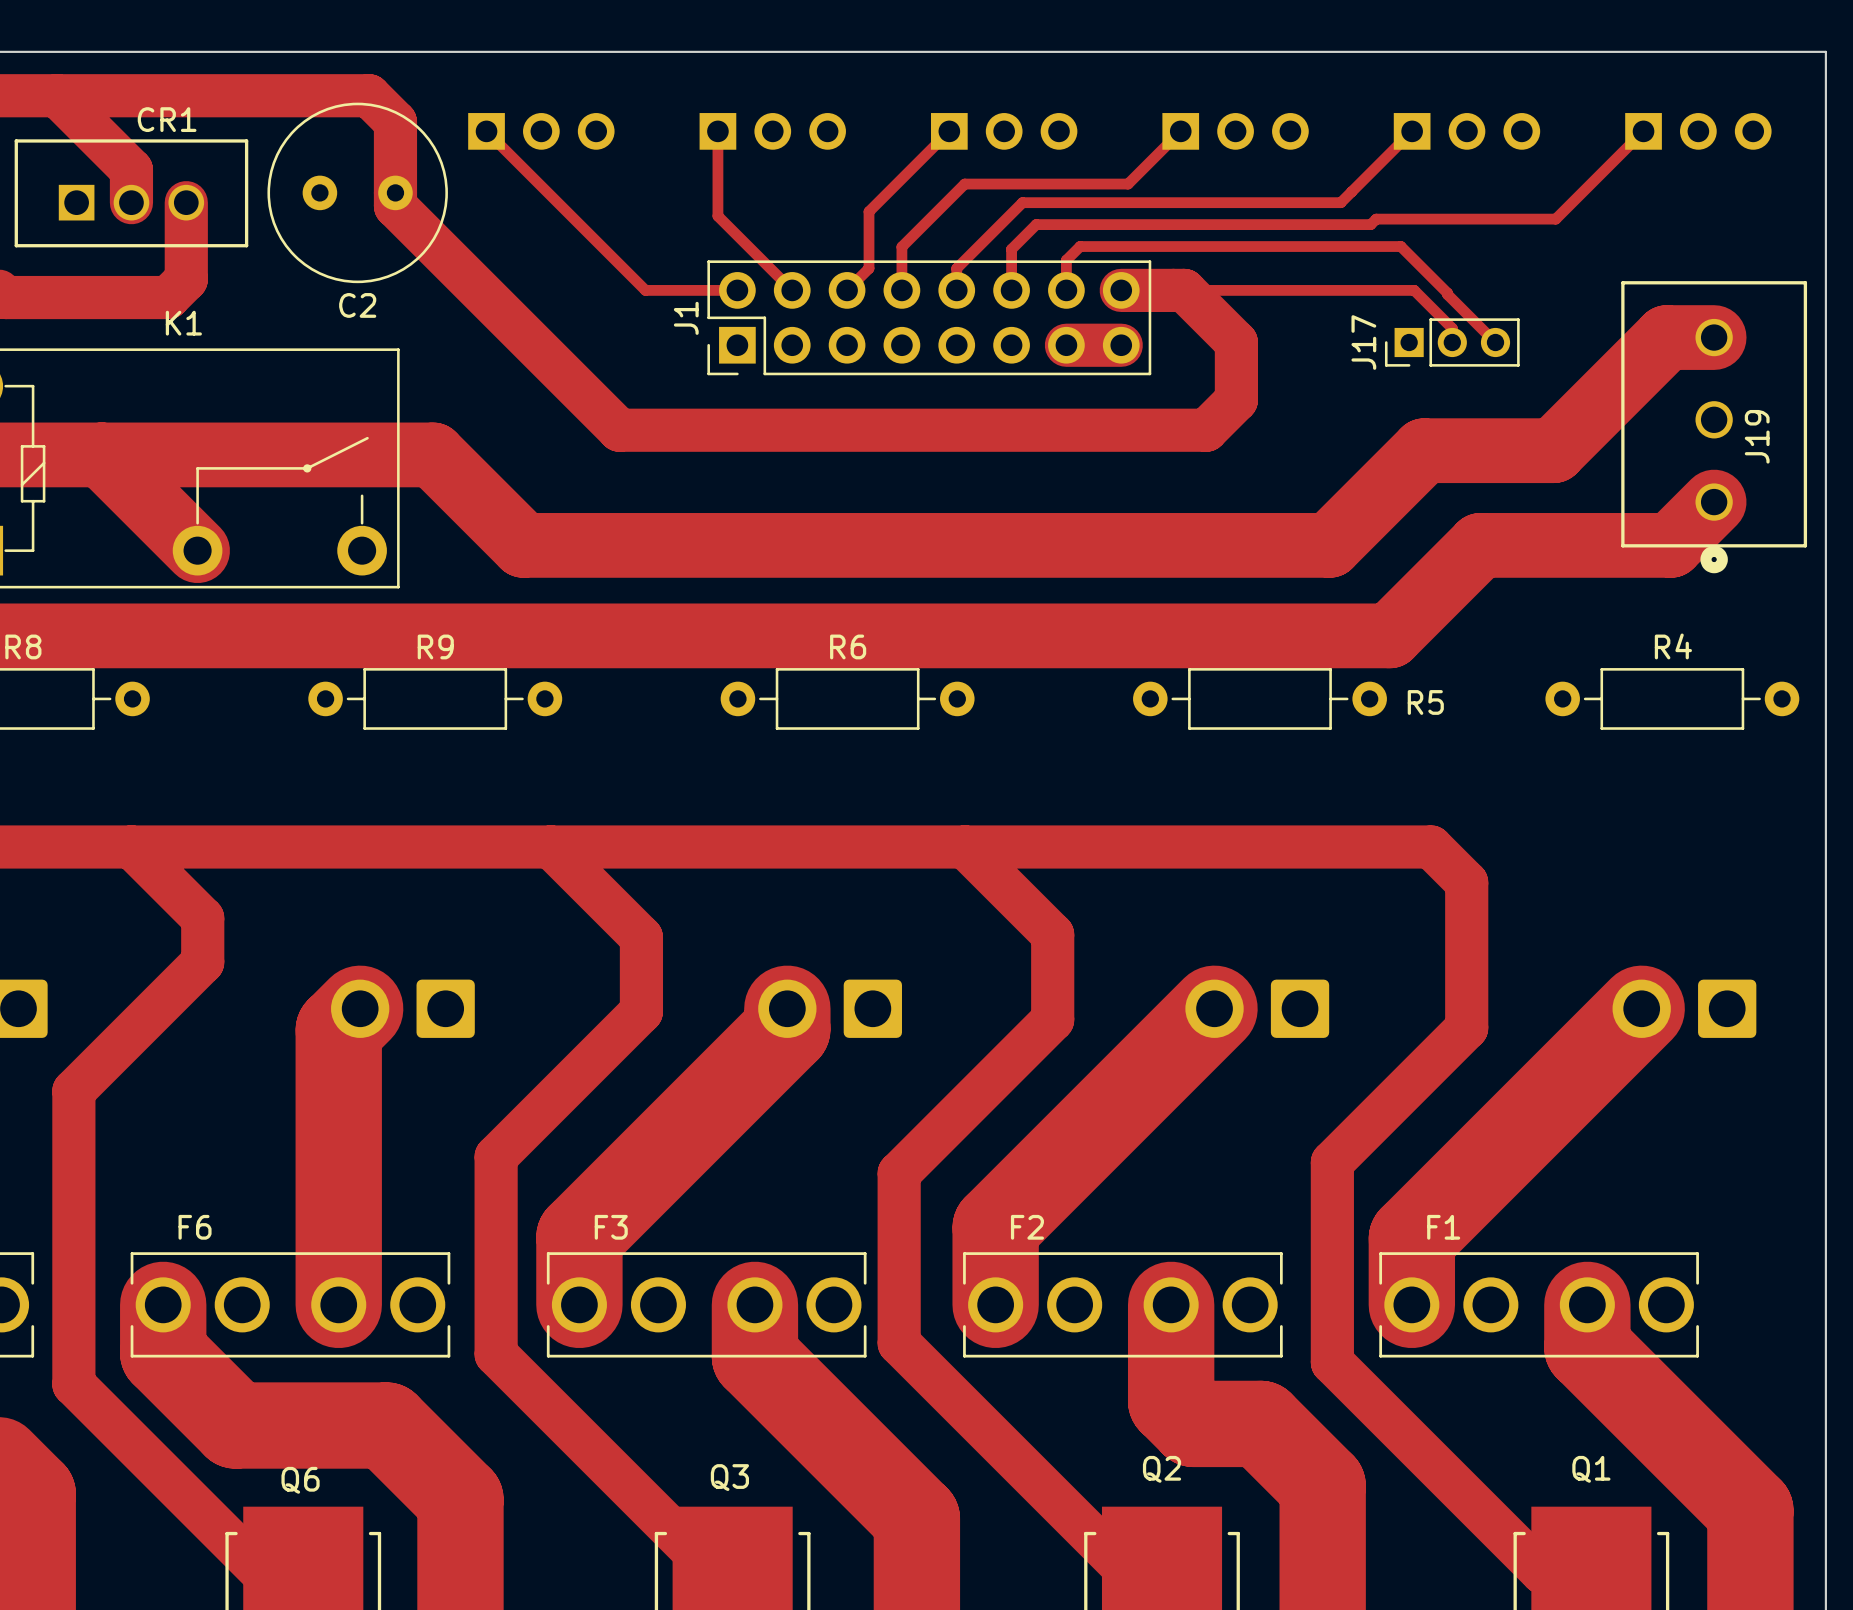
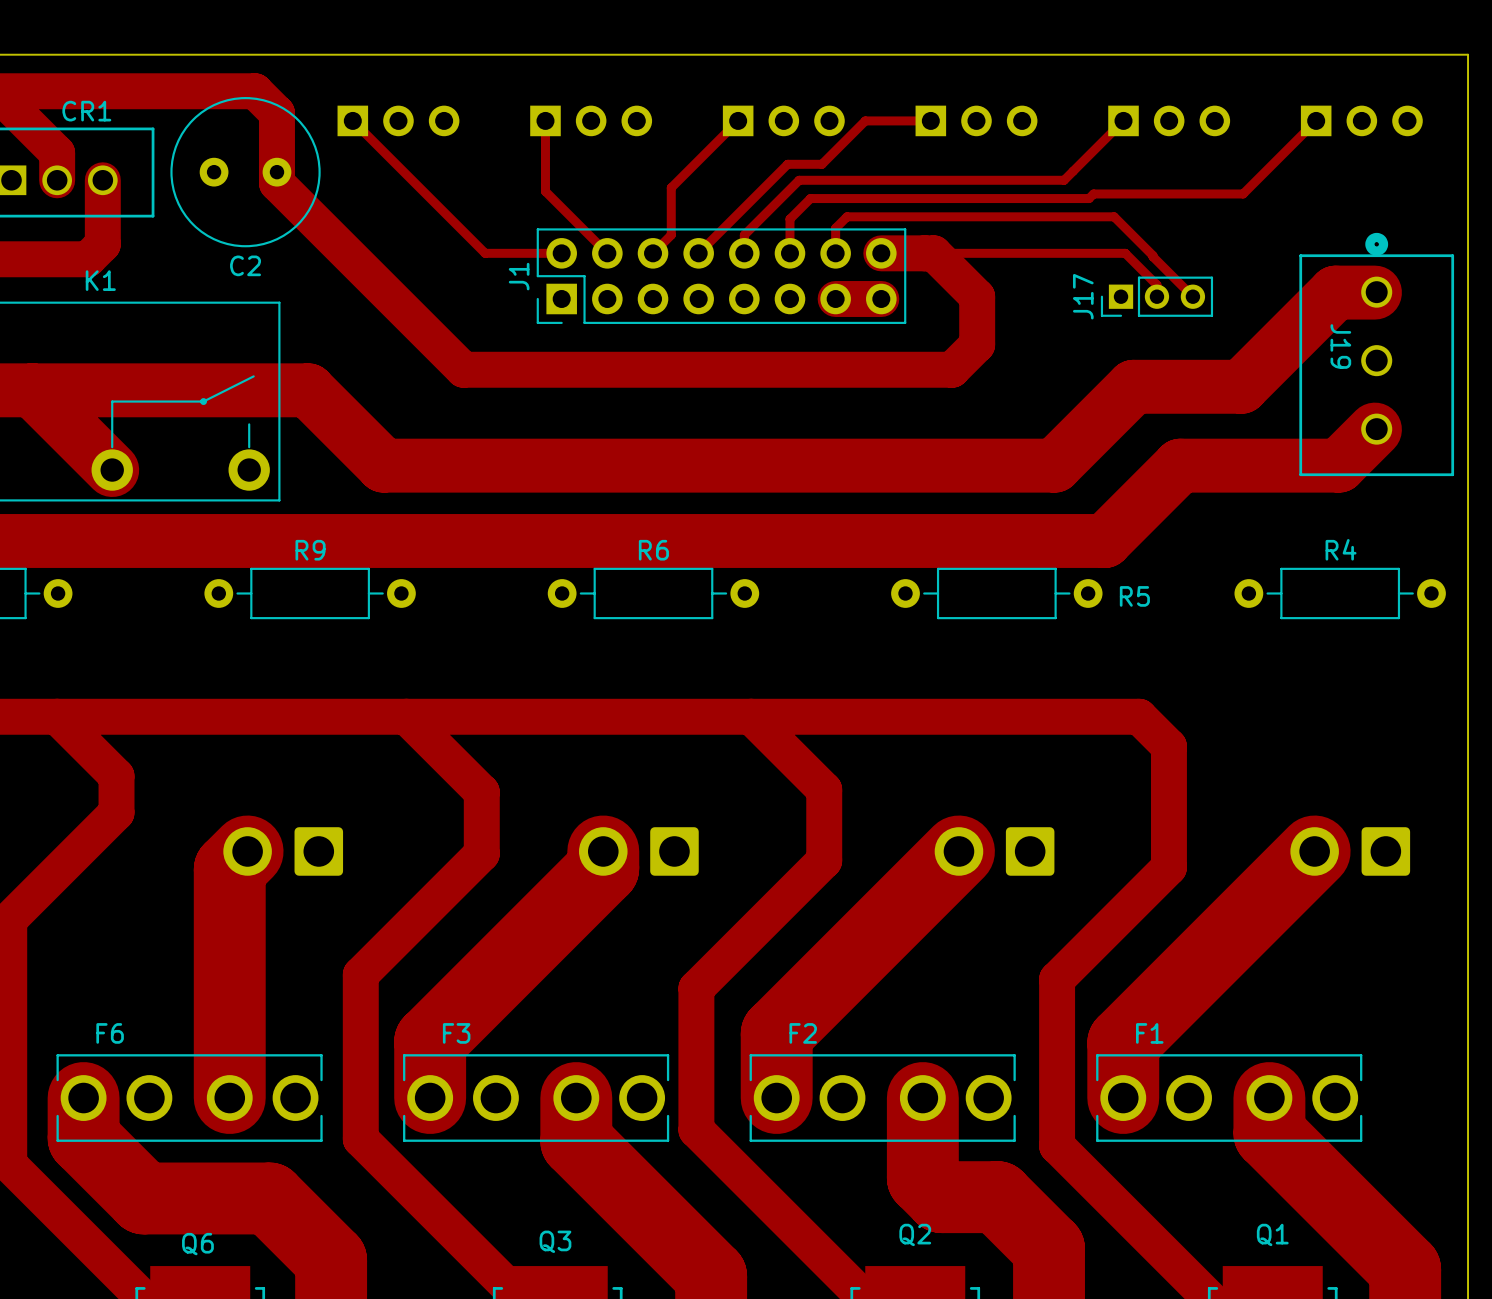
track: (1180, 131) (1128, 184) (964, 184) (901, 246) (901, 290) -> (930, 120) (865, 120) (821, 164) (787, 164) (698, 253)
J19 rotation: 0° (1714, 427) -> 180° (1376, 354)

